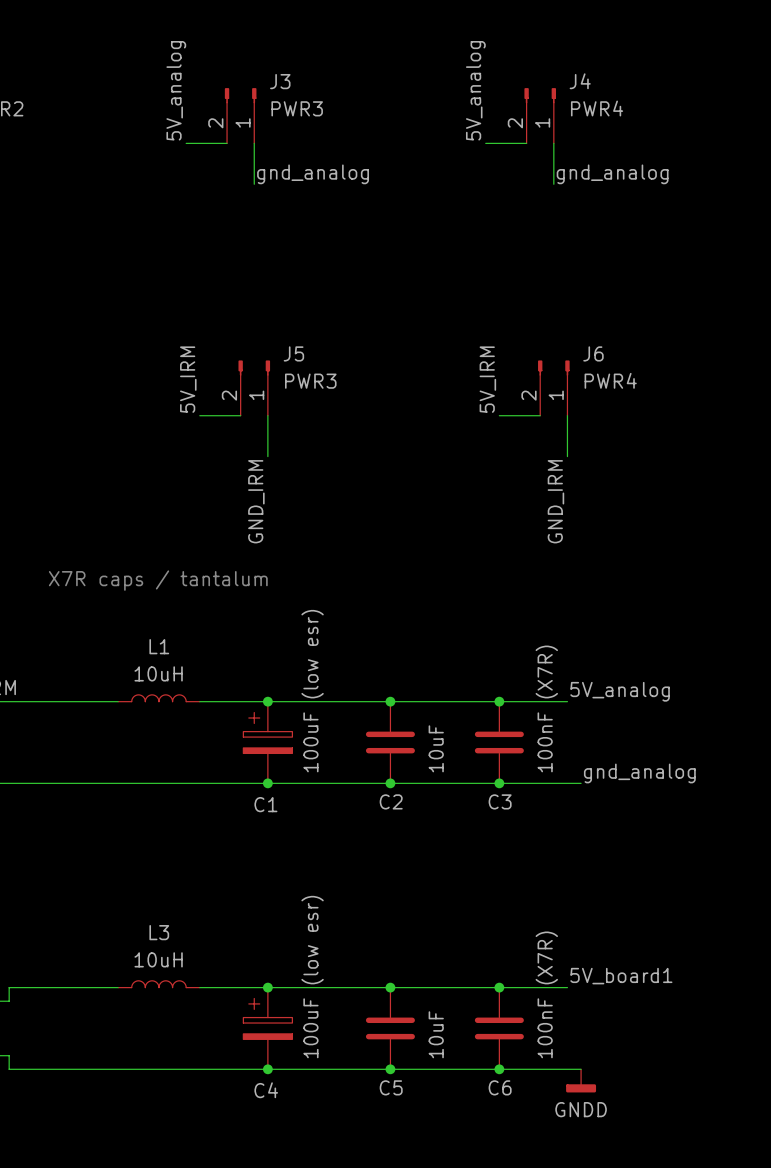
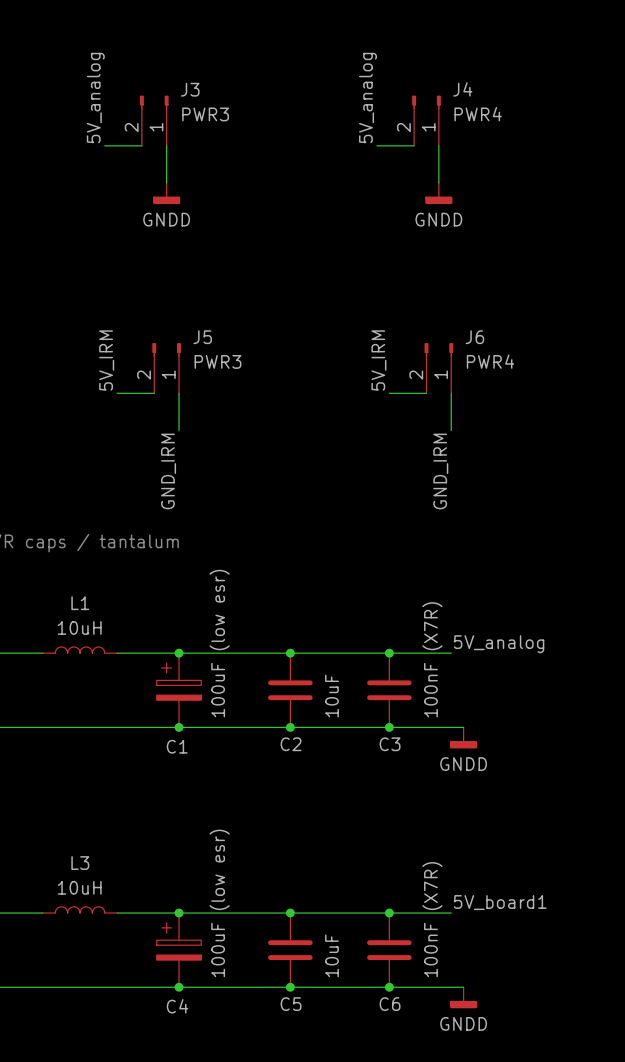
label: gnd_analog (313, 174) -> none
label: gnd_analog (612, 174) -> none
power symbol: none -> GNDD (166, 193)
power symbol: none -> GNDD (438, 193)
label: gnd_analog (639, 773) -> none
power symbol: none -> GNDD (463, 737)

